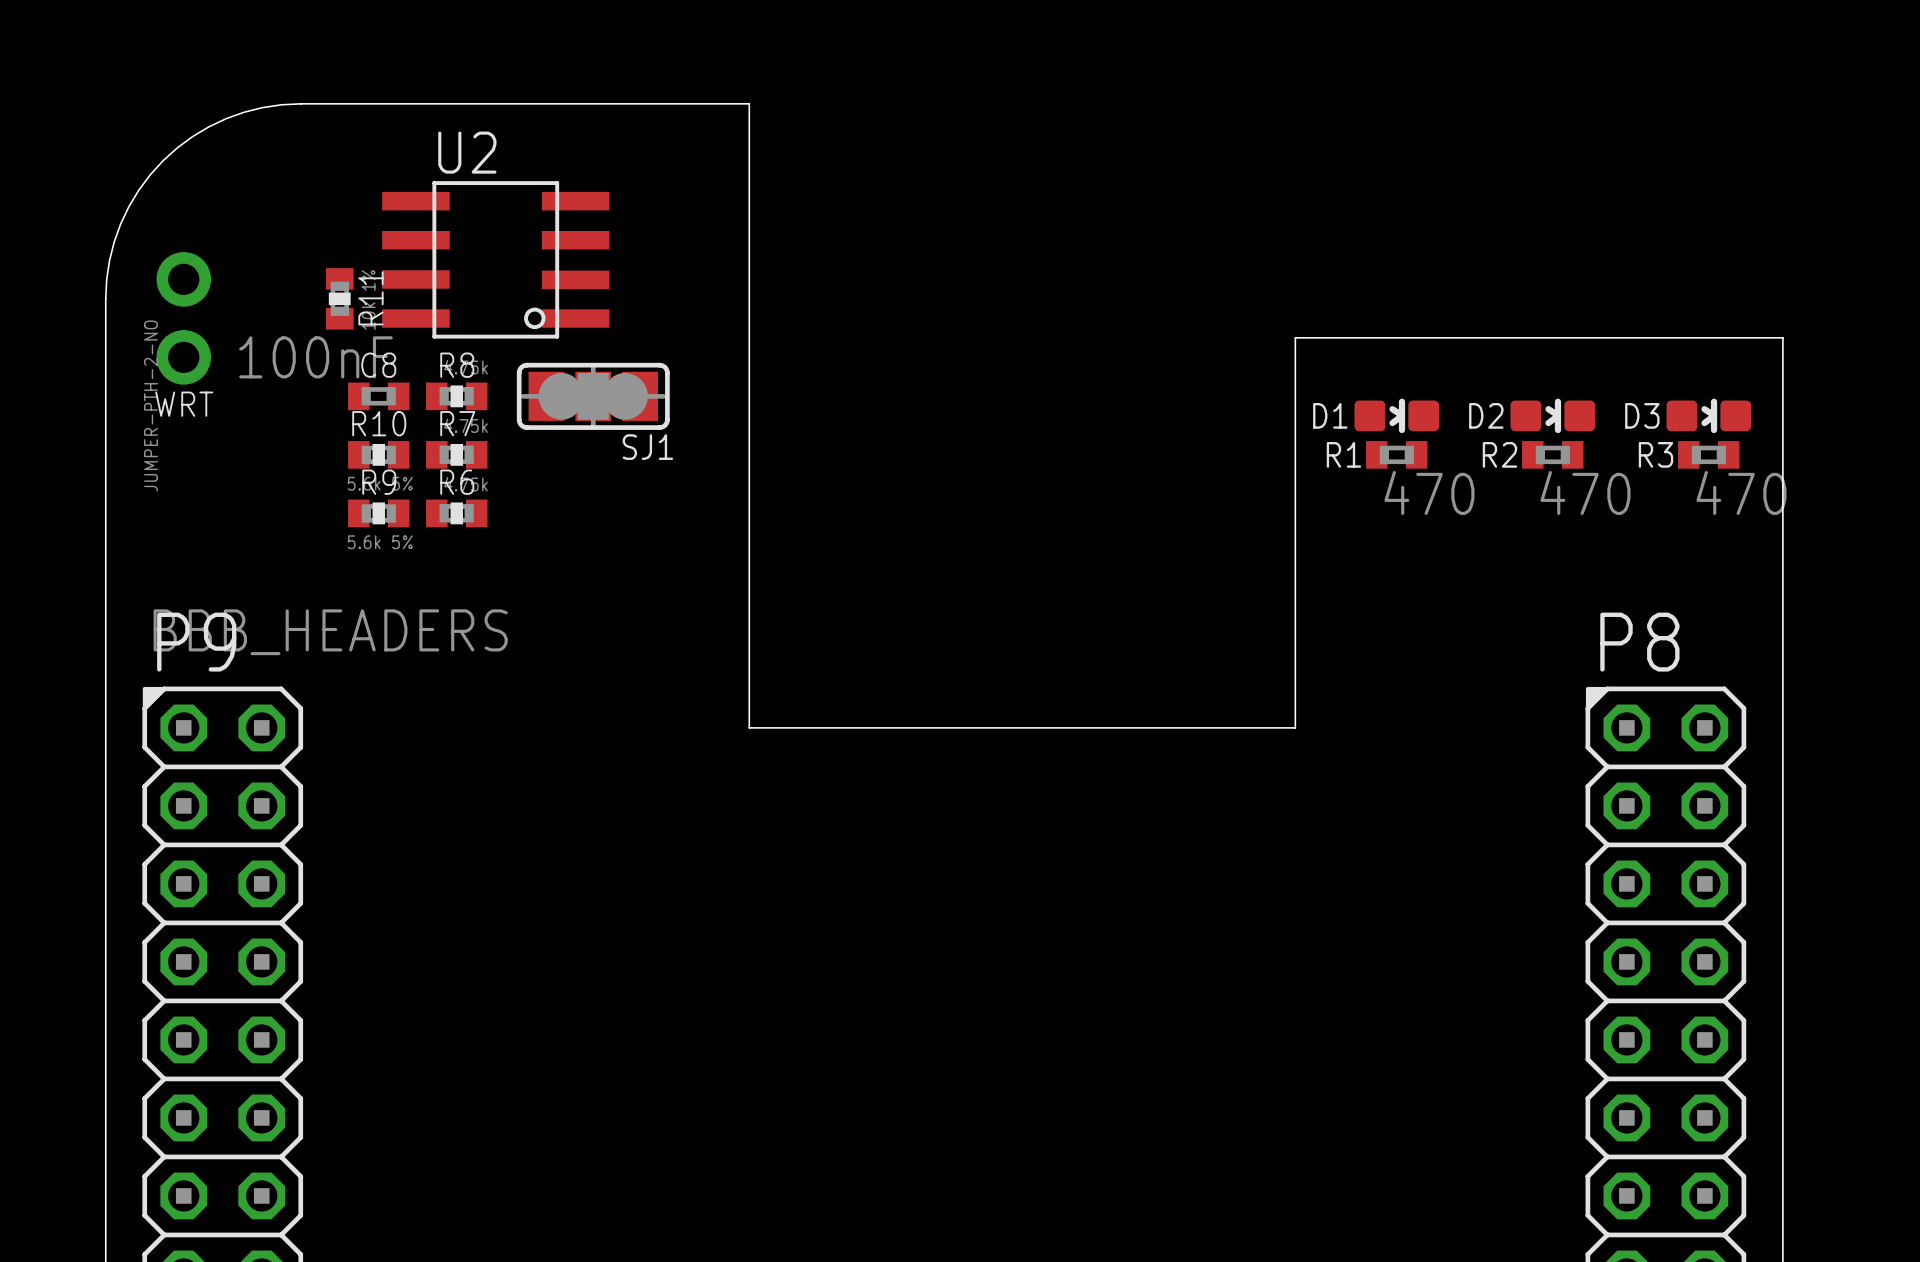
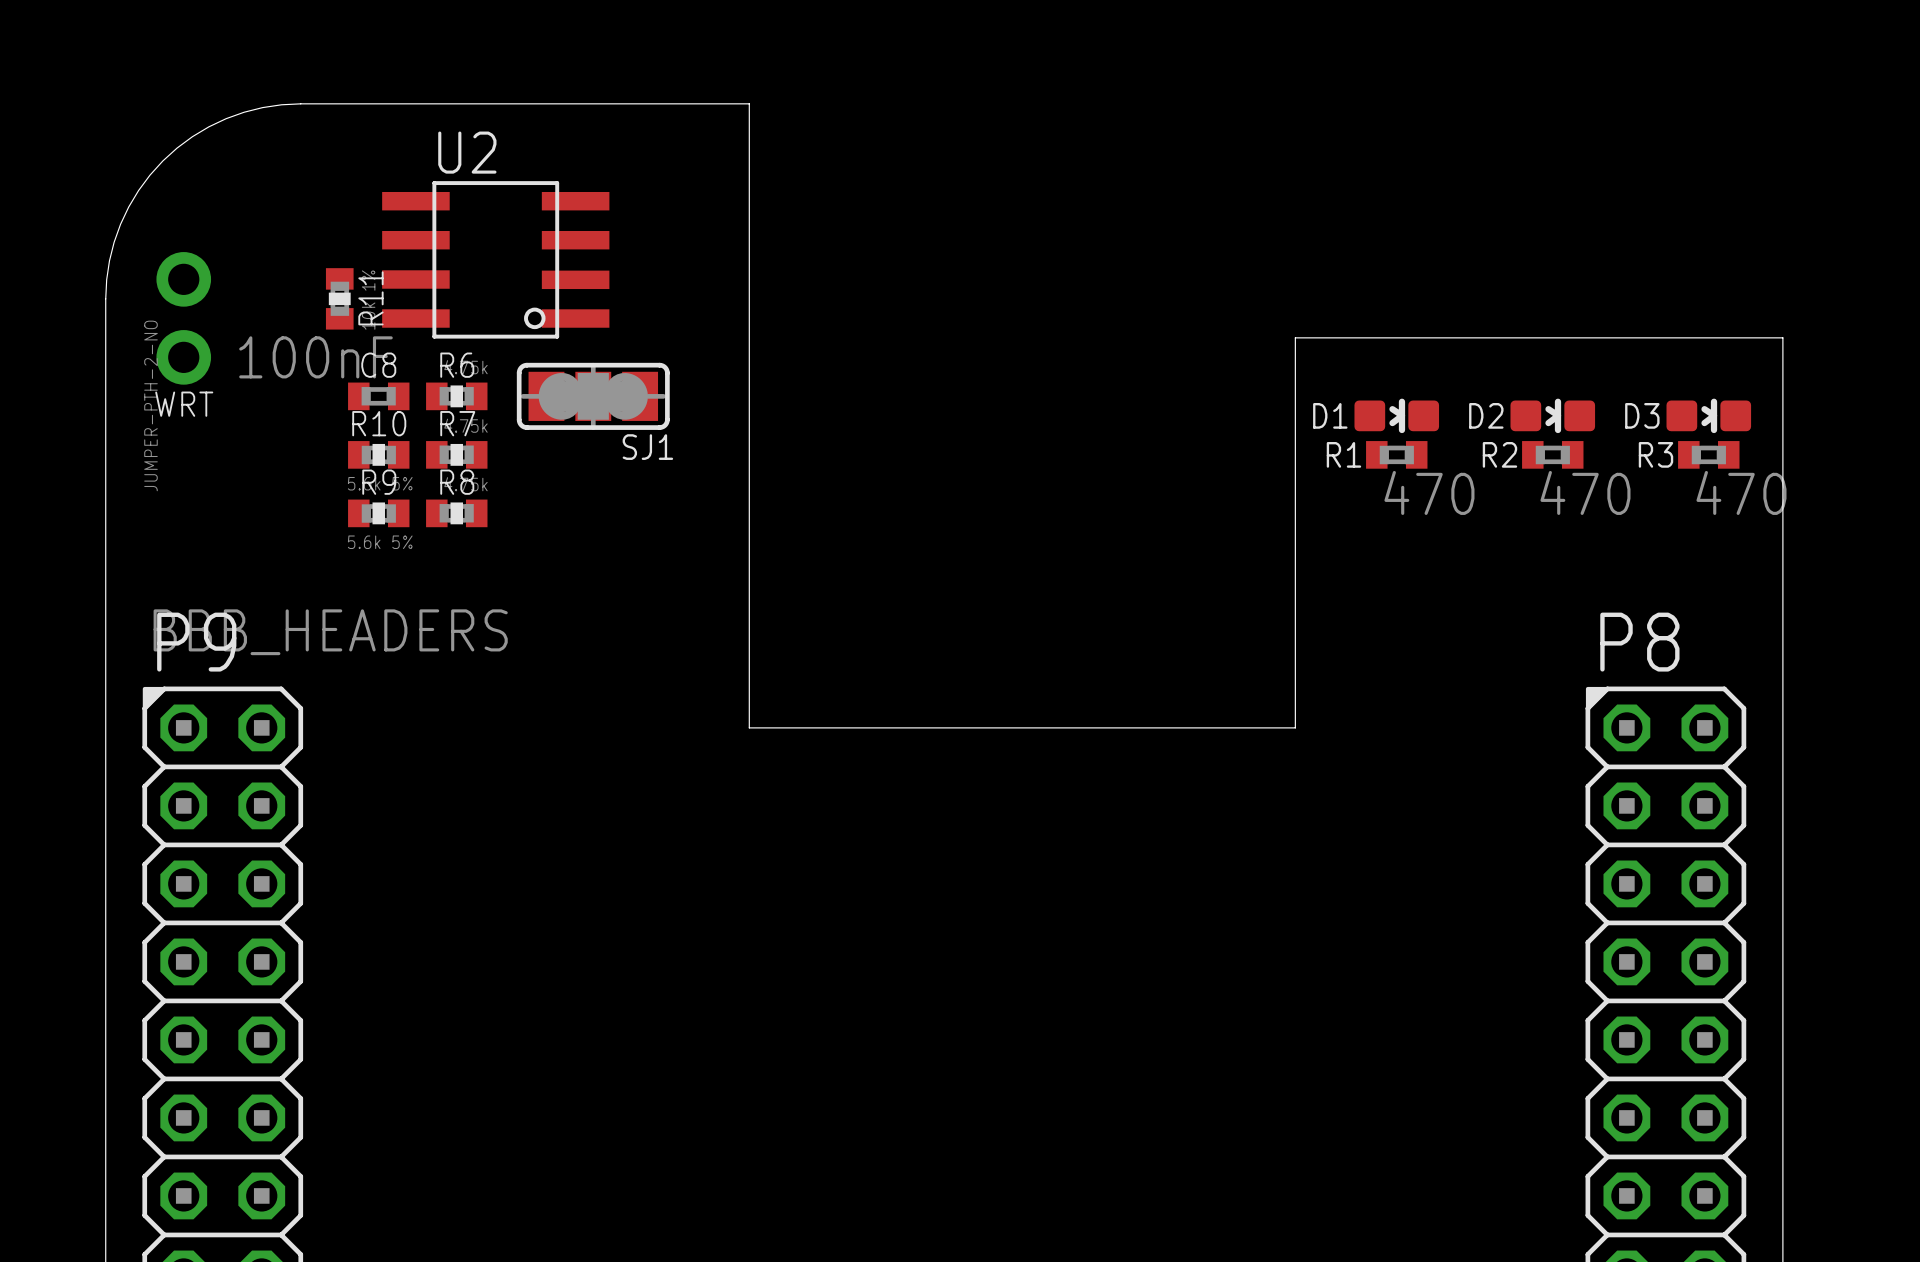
R8 name: R8 (457, 365) -> R6 (457, 365)
R6 name: R6 (457, 482) -> R8 (457, 482)

